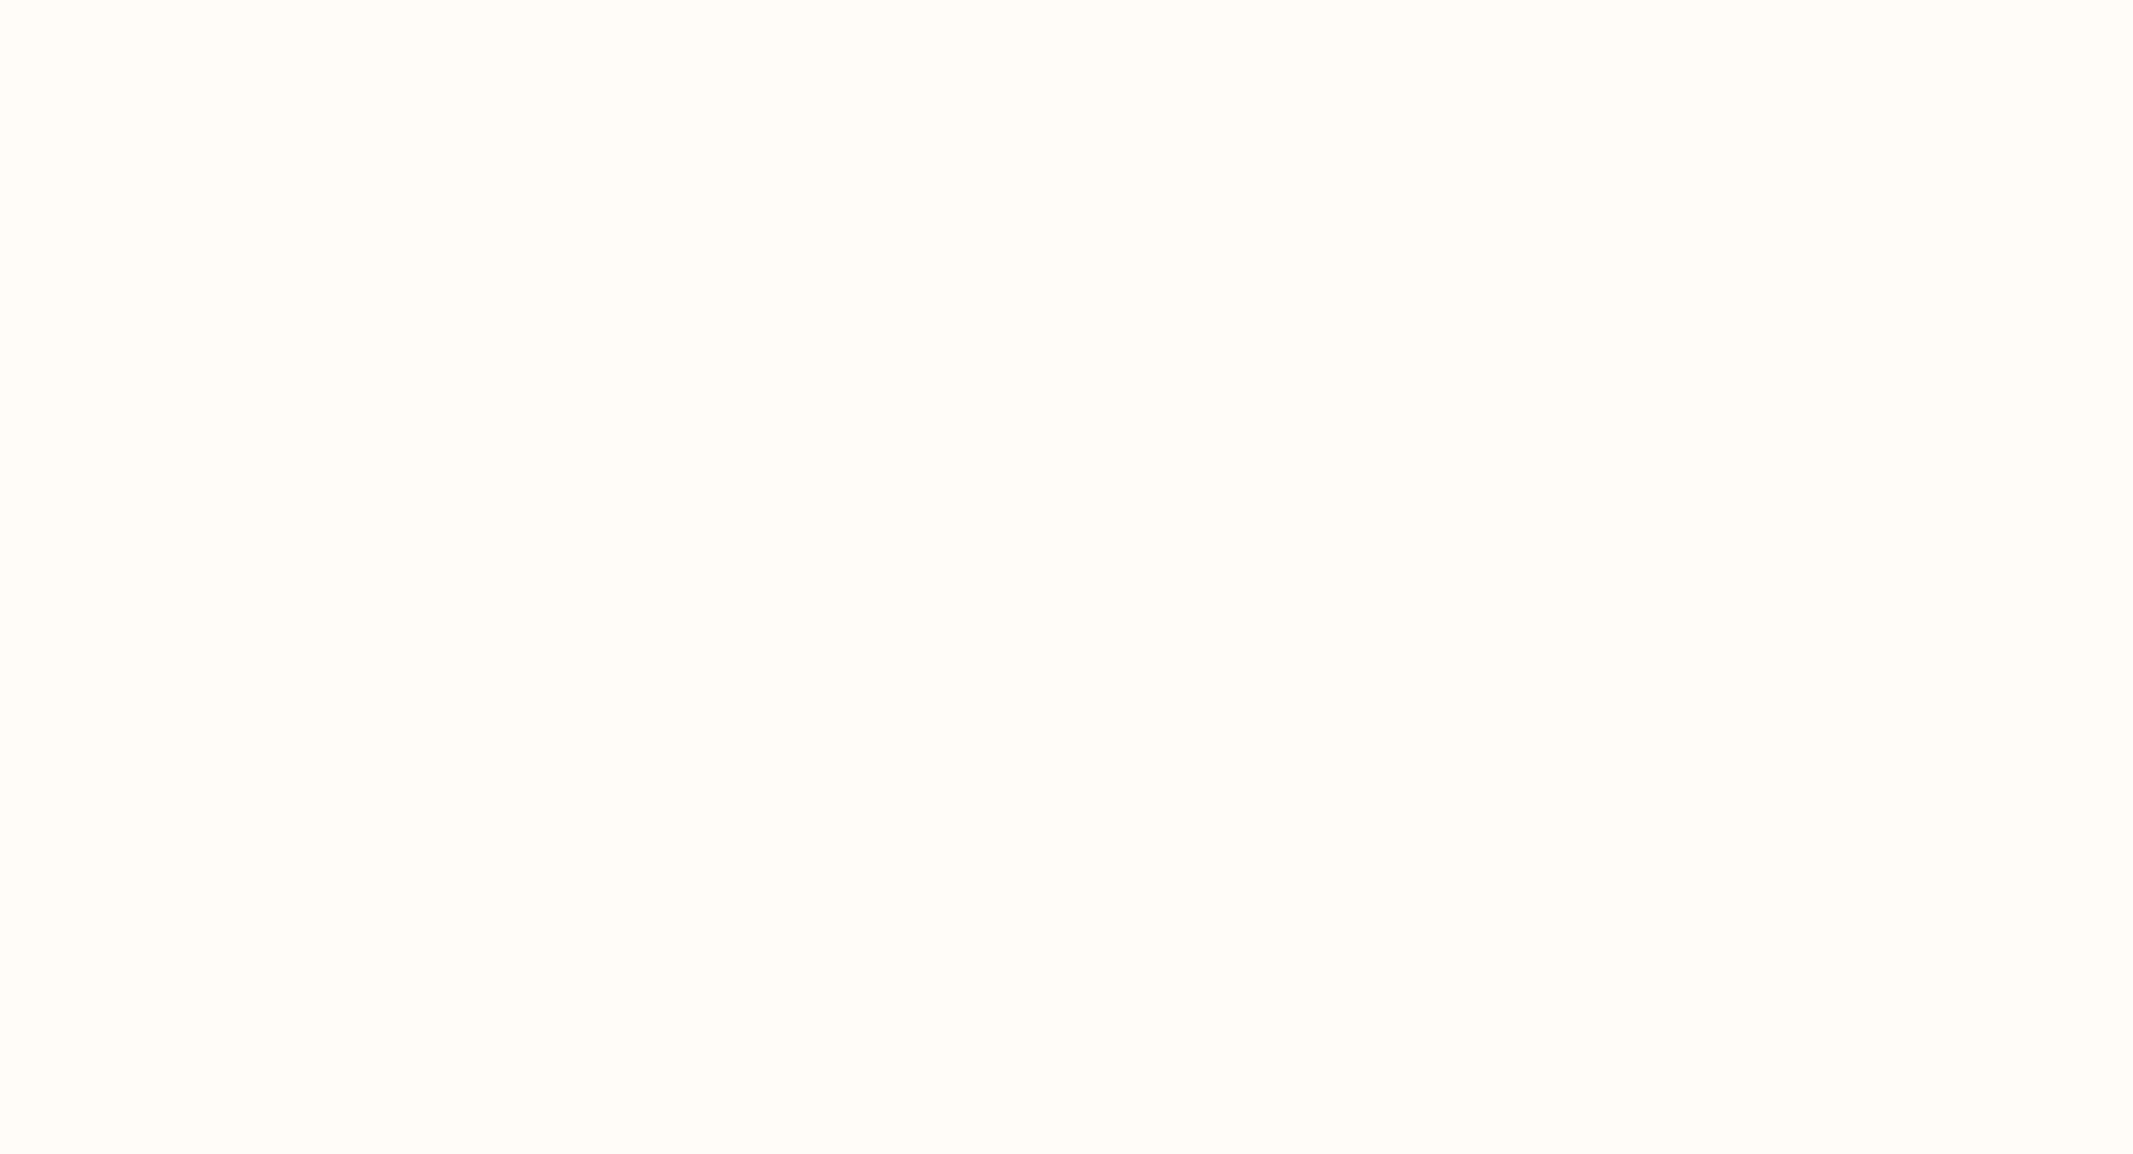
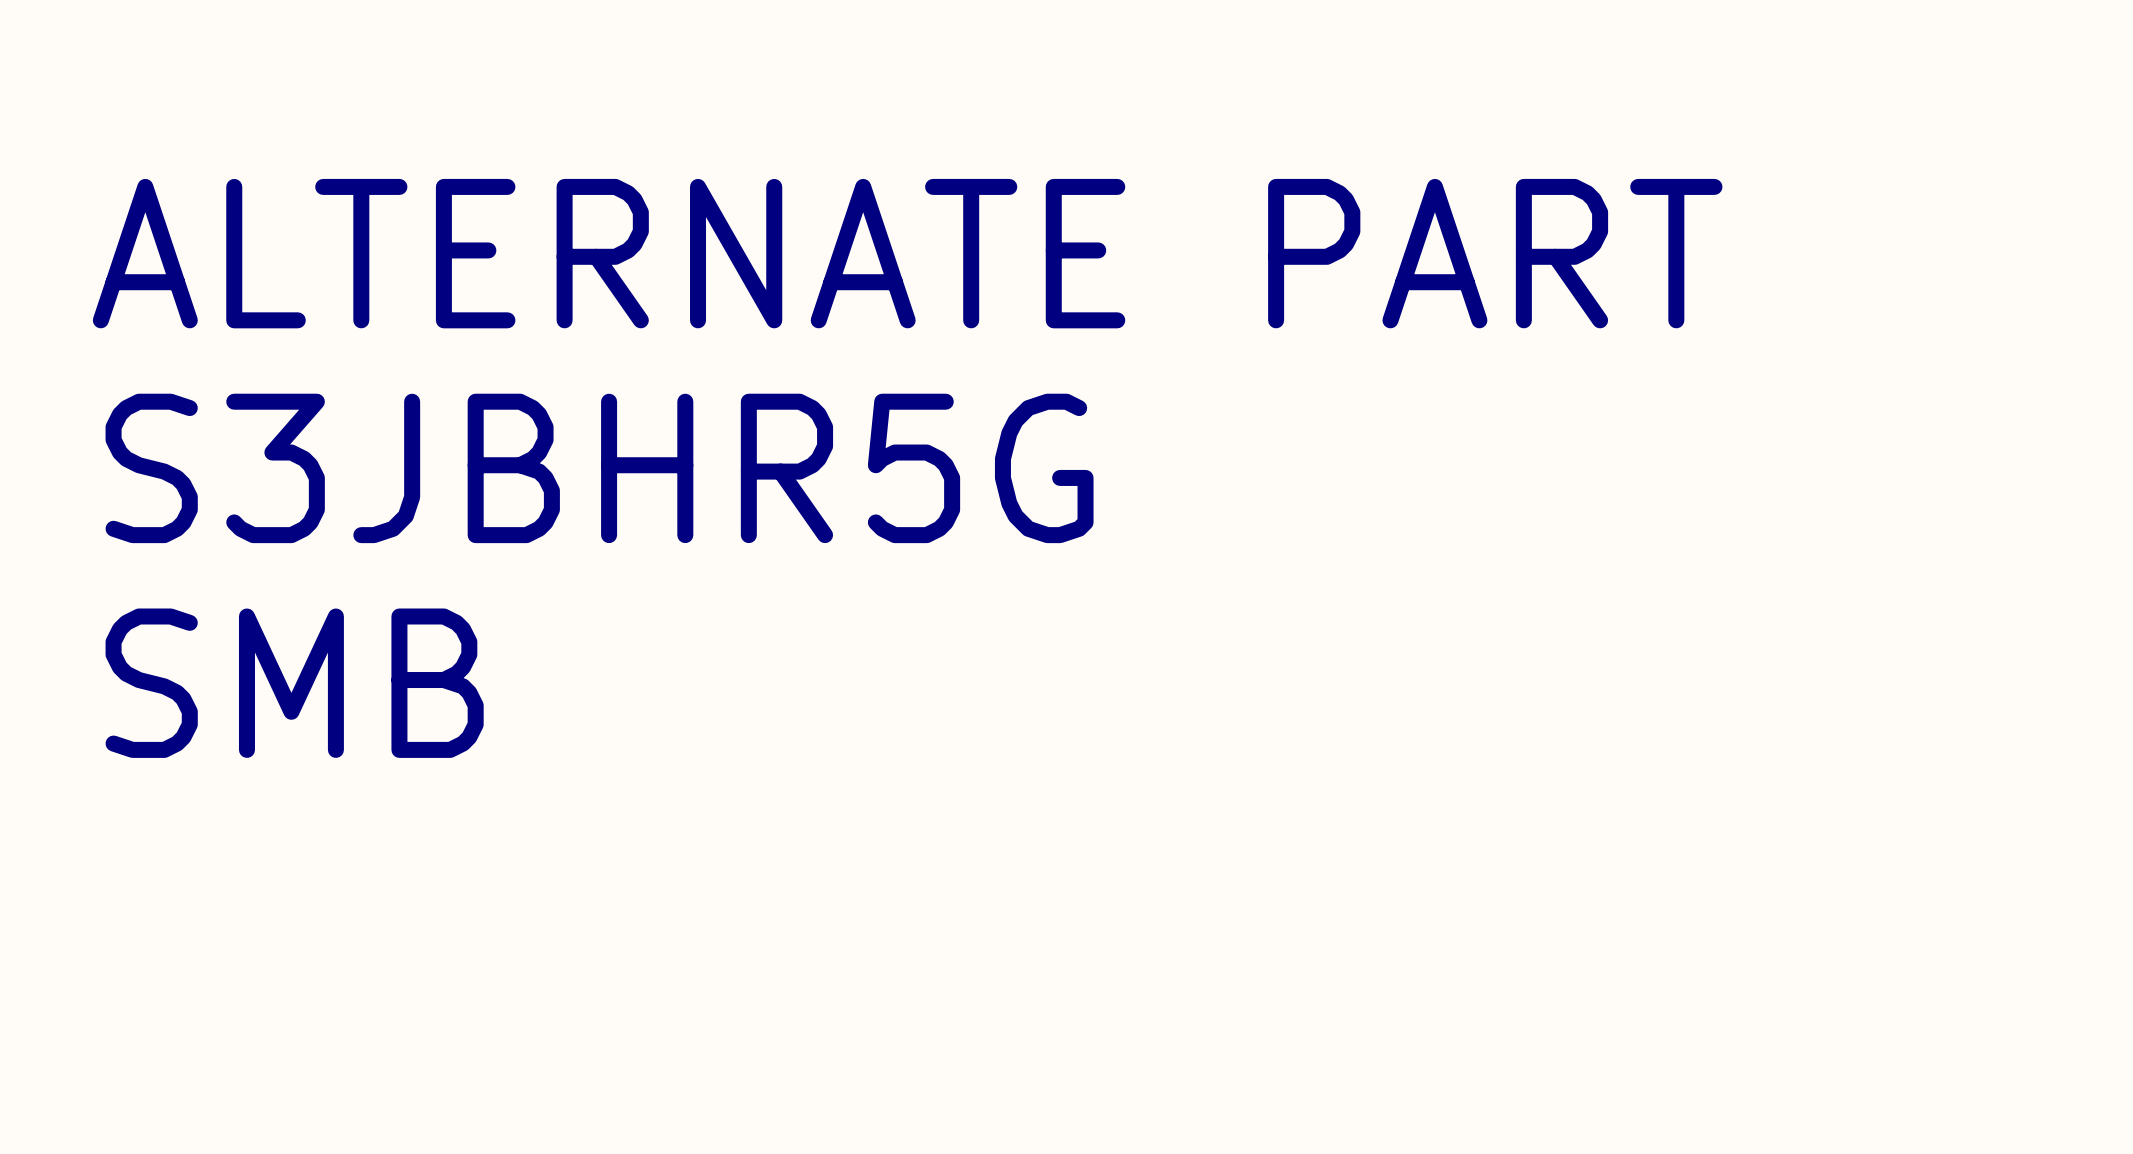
text: none -> ALTERNATE PART (907, 253)
text: none -> S3JBHR5G (599, 468)
text: none -> SMB (294, 683)

